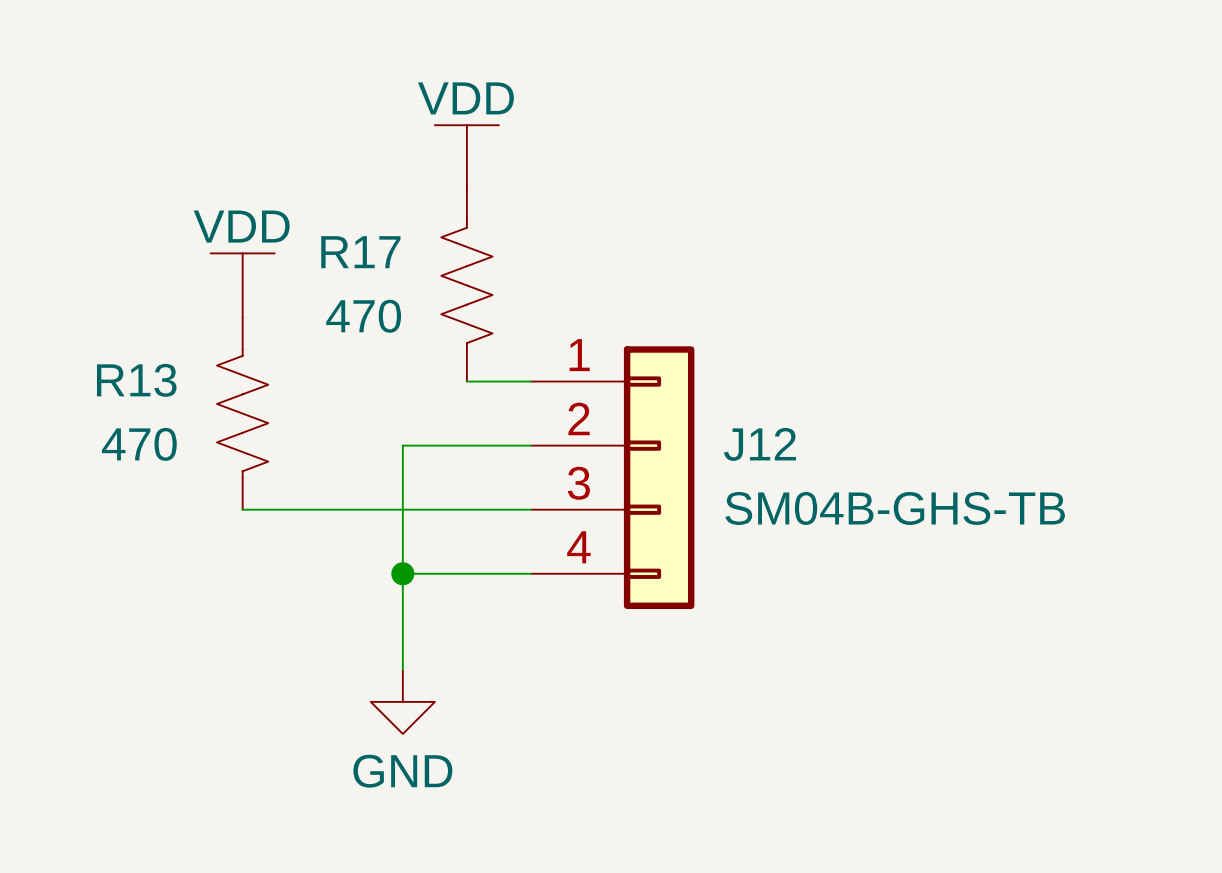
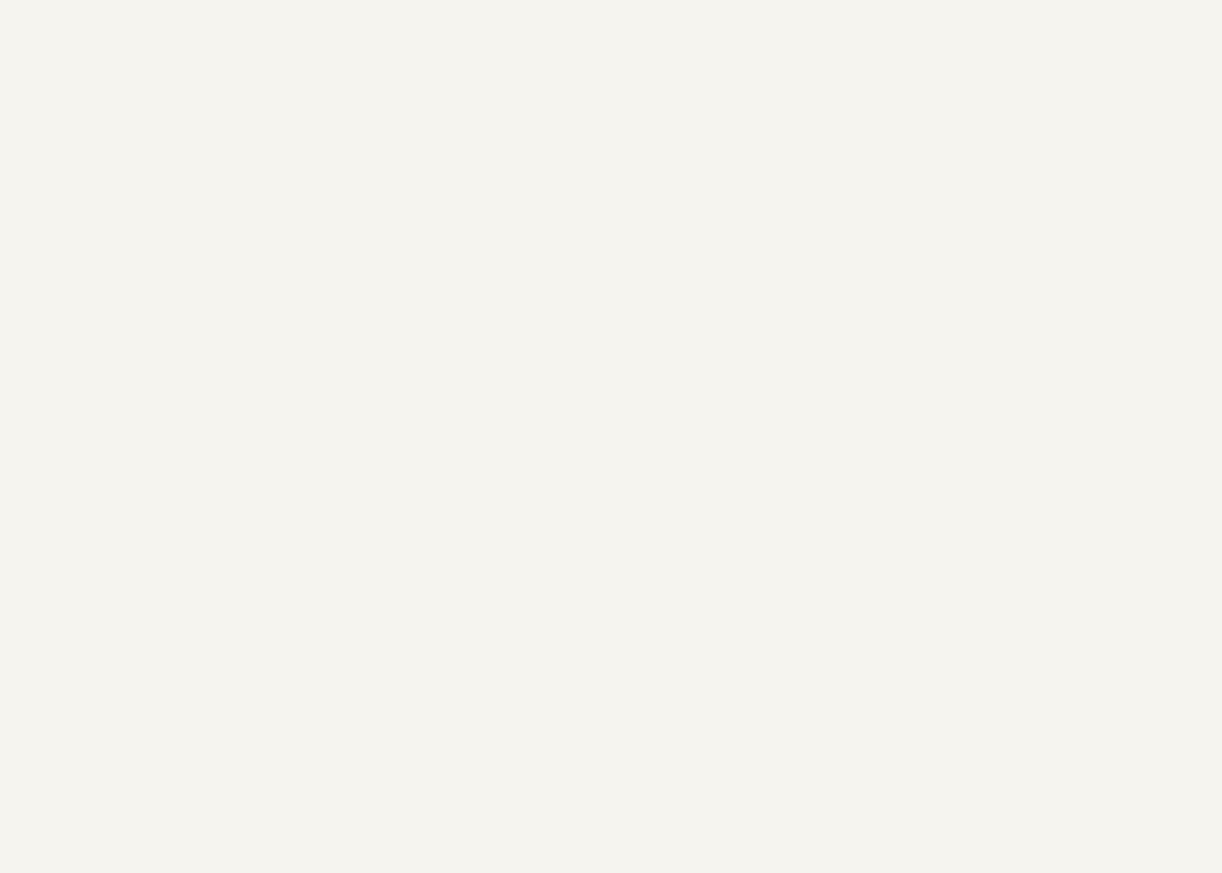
power symbol: VDD (466, 157) -> none
power symbol: VDD (242, 285) -> none
R17: 470 (466, 285) -> none
wire: (466, 381) (531, 381) -> none
R13: 470 (242, 413) -> none
wire: (531, 445) (402, 445) (402, 669) -> none
J12: SM04B-GHS-TB (612, 477) -> none
wire: (242, 509) (531, 509) -> none
wire: (402, 573) (531, 573) -> none
junction: (402, 573) -> none
power symbol: GND (402, 701) -> none

